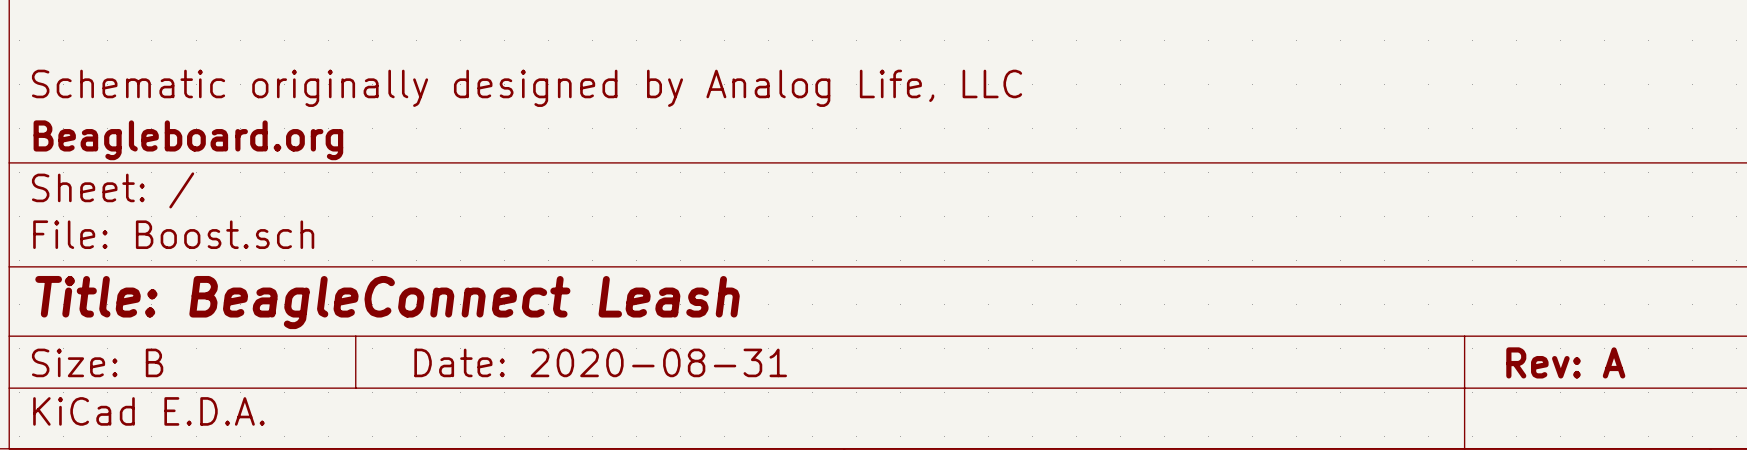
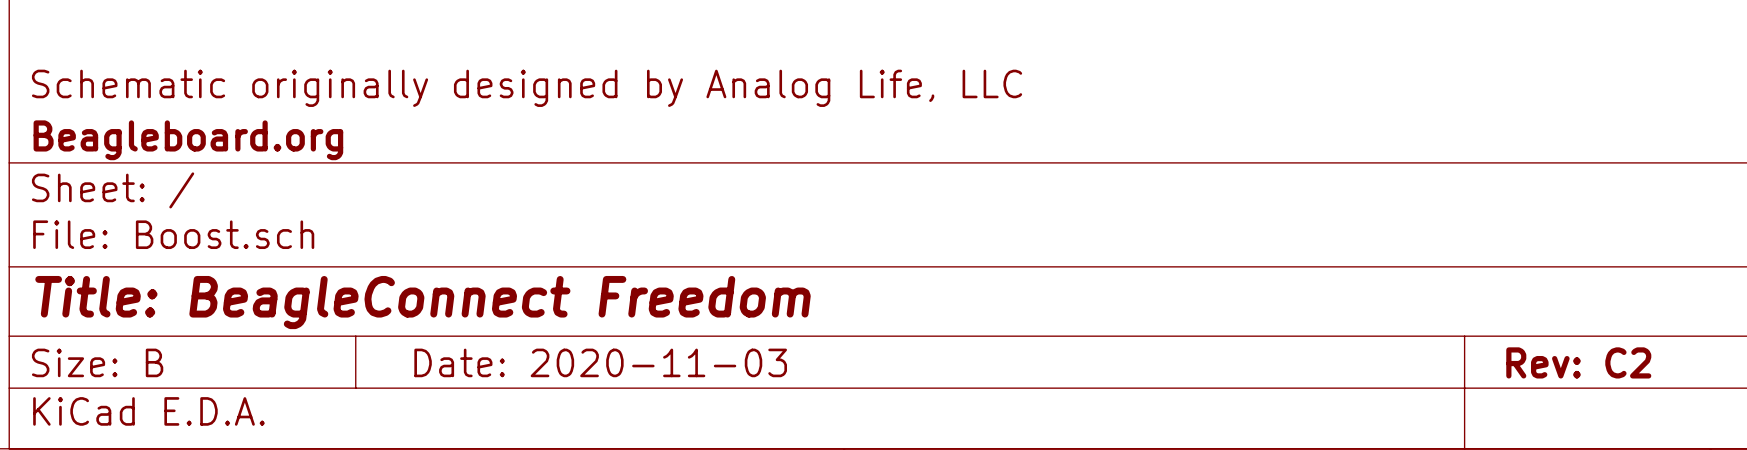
title block: Title: BeagleConnect Leash (387, 302) -> Title: BeagleConnect Freedom (423, 302)
title block: Date: 2020-08-31 (600, 362) -> Date: 2020-11-03 (600, 362)
title block: Rev: A (1565, 362) -> Rev: C2 (1578, 362)

